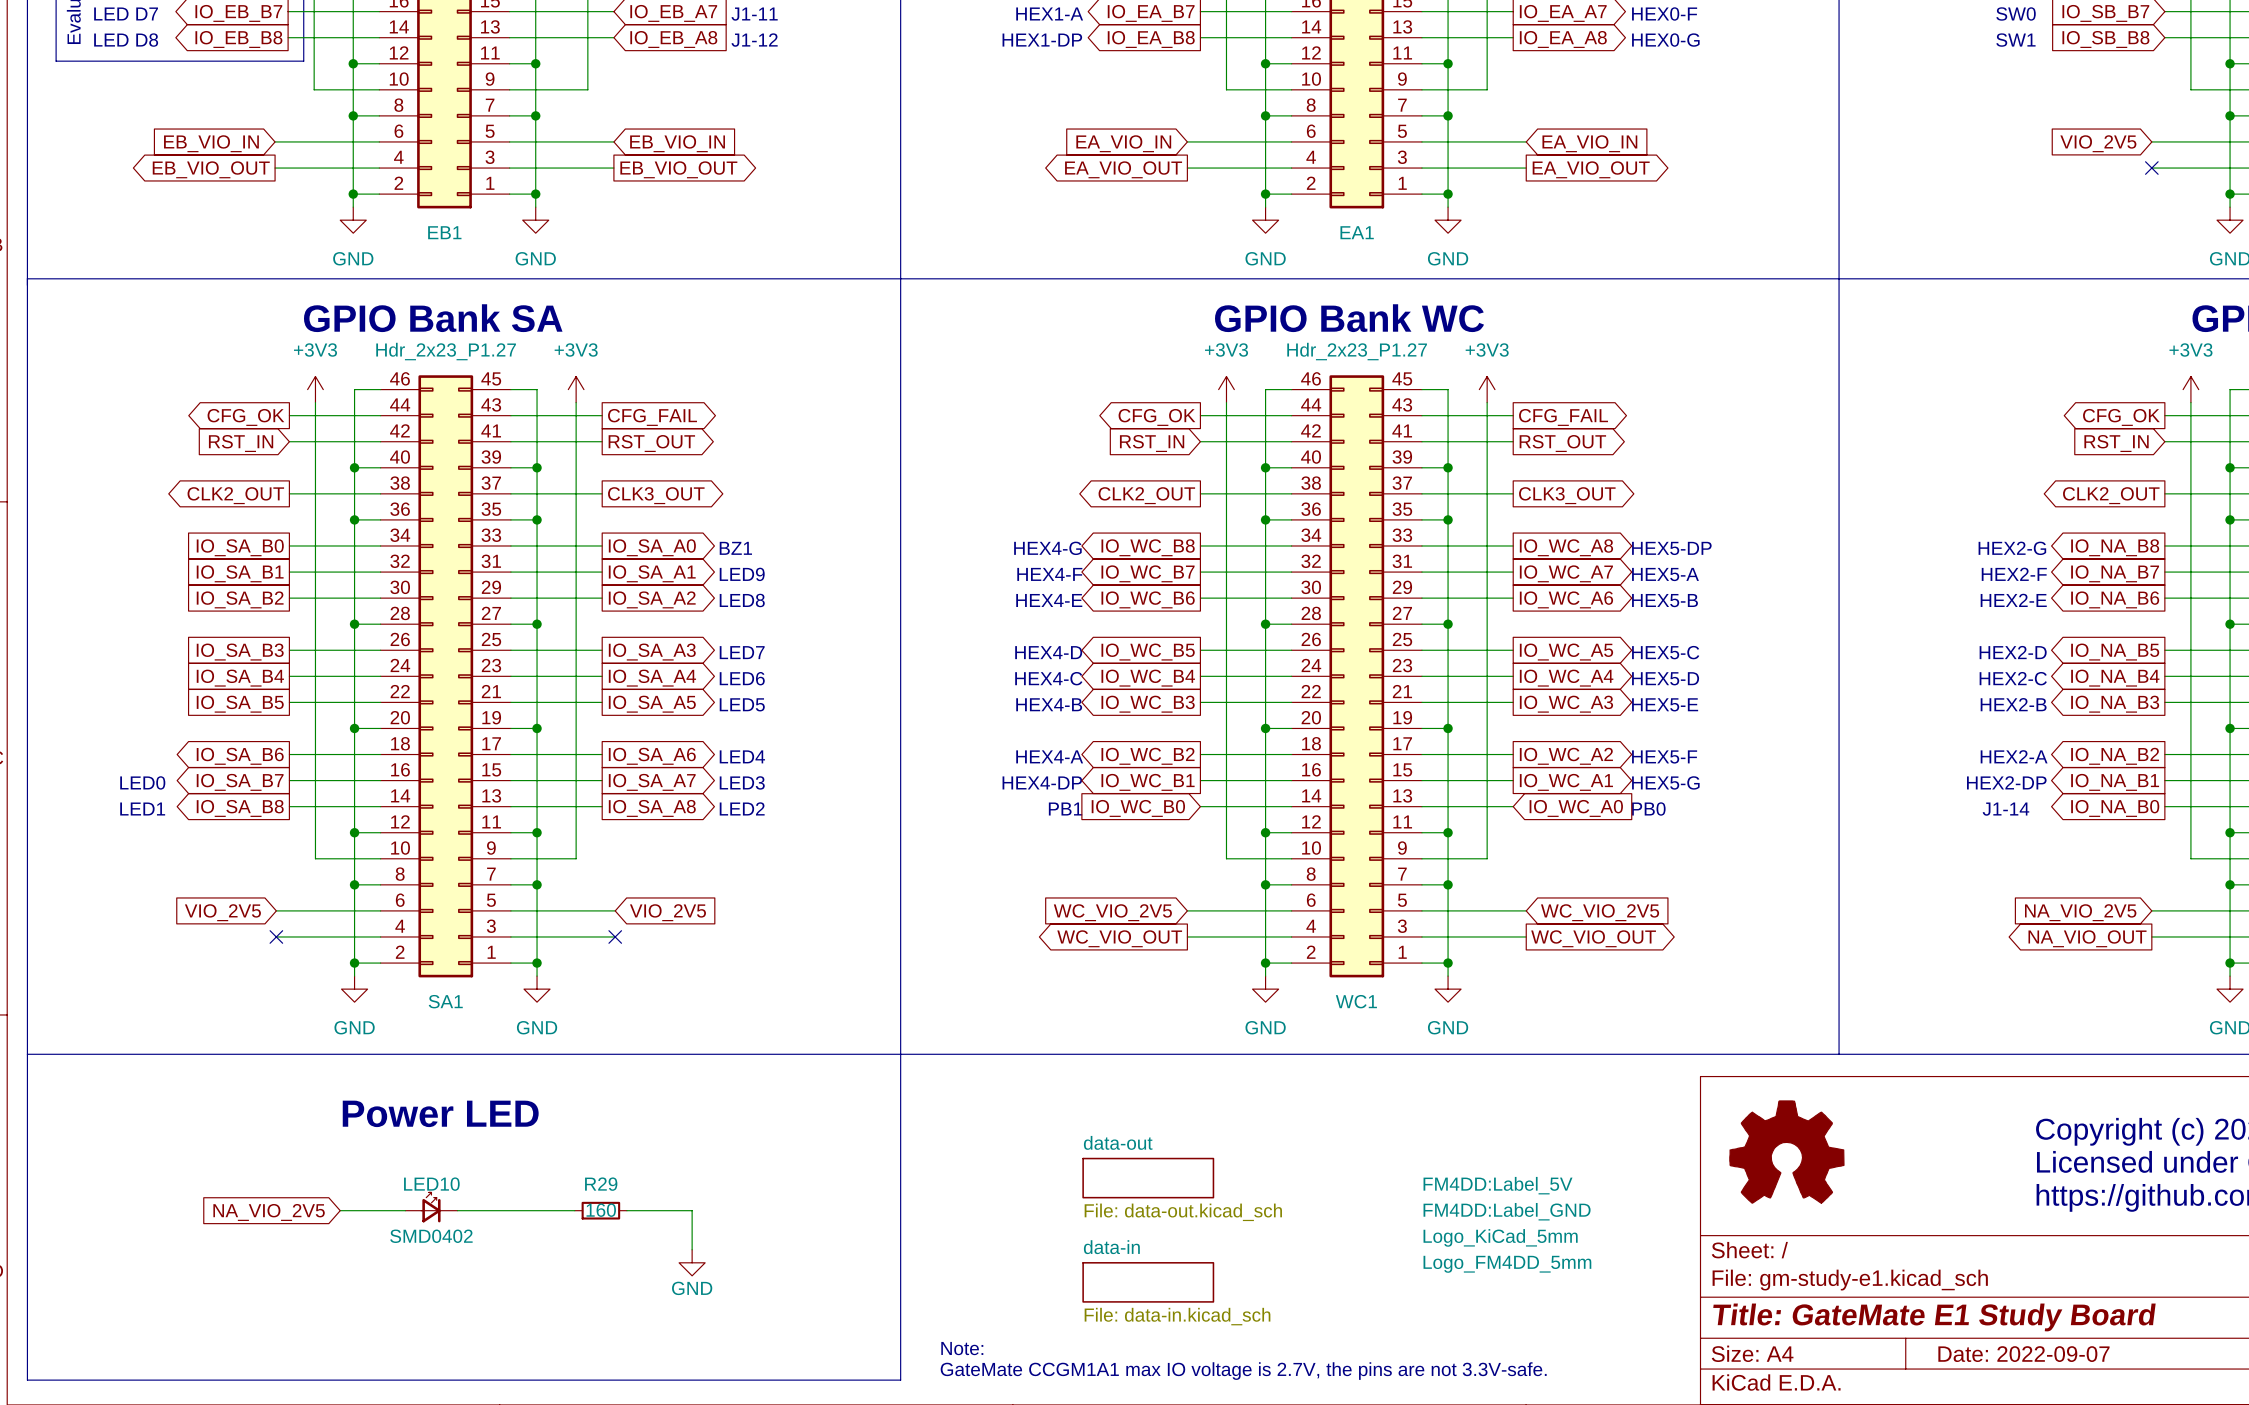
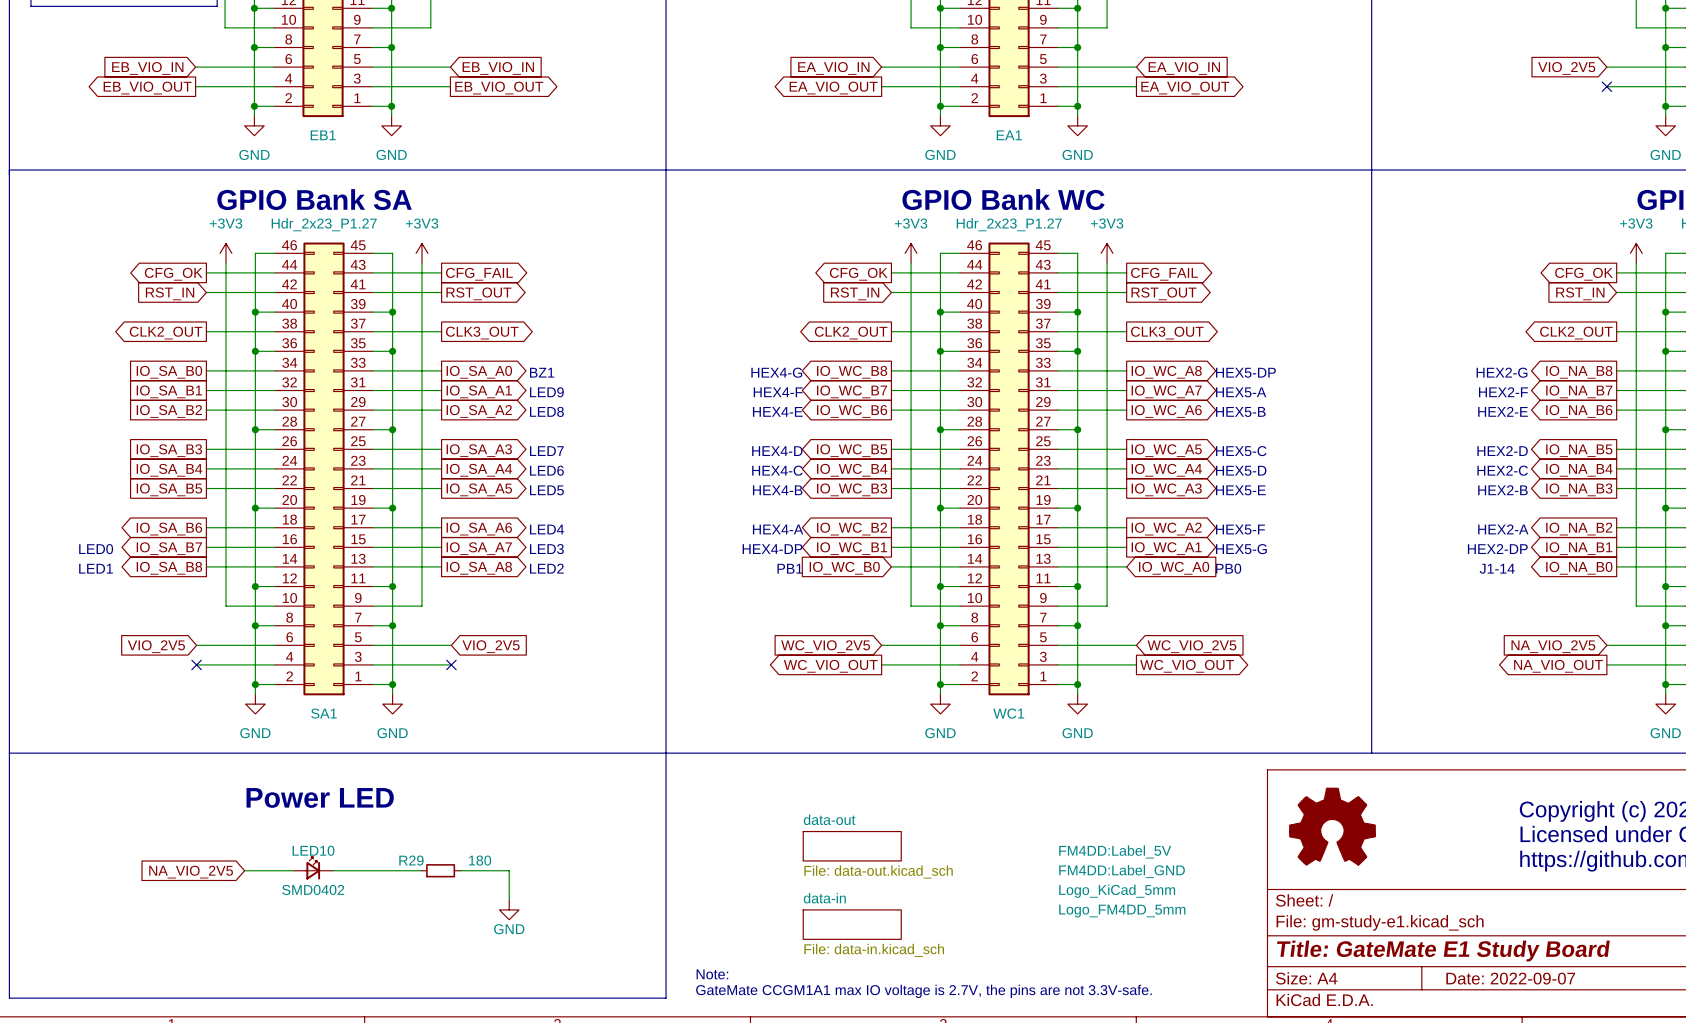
R29 name position: R29 (601, 1184) -> R29 (411, 860)
R29 value: 160 (601, 1210) -> 180 (480, 860)

